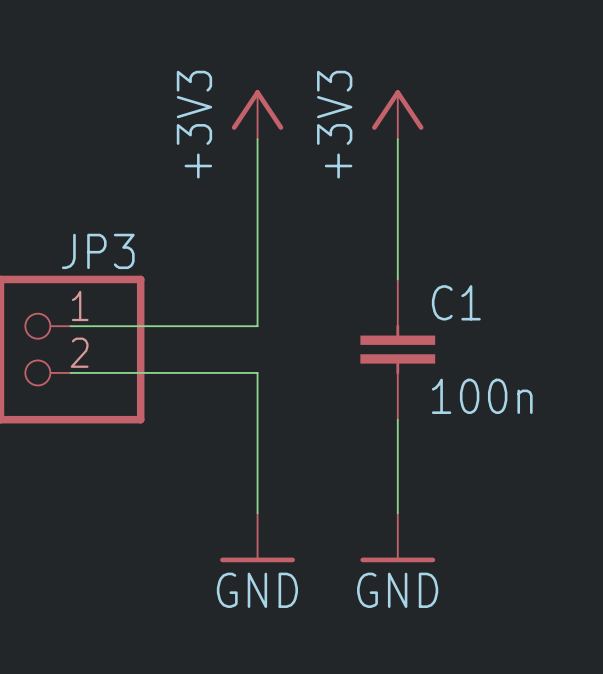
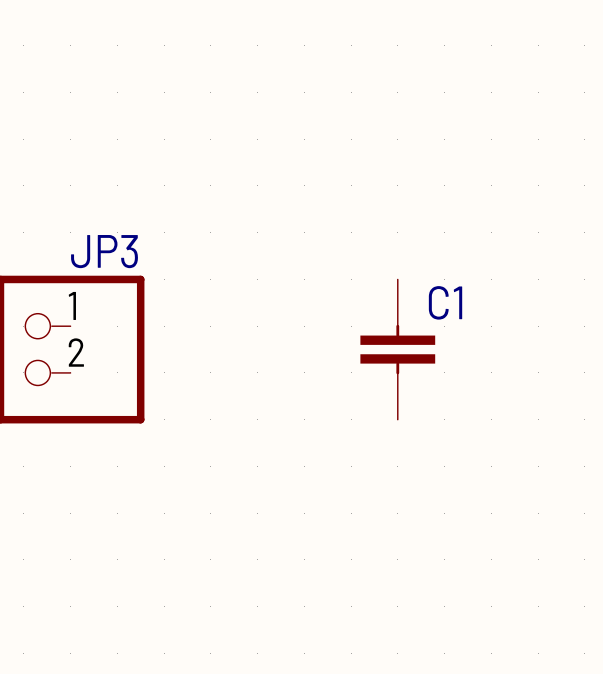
power symbol: +3V3 (257, 114) -> none
power symbol: +3V3 (397, 114) -> none
wire: (257, 139) (257, 326) (70, 326) -> none
wire: (397, 139) (397, 279) -> none
wire: (70, 372) (257, 372) (257, 513) -> none
C1 value: 100n (482, 396) -> none
wire: (397, 419) (397, 513) -> none
power symbol: GND (257, 537) -> none
power symbol: GND (397, 537) -> none

